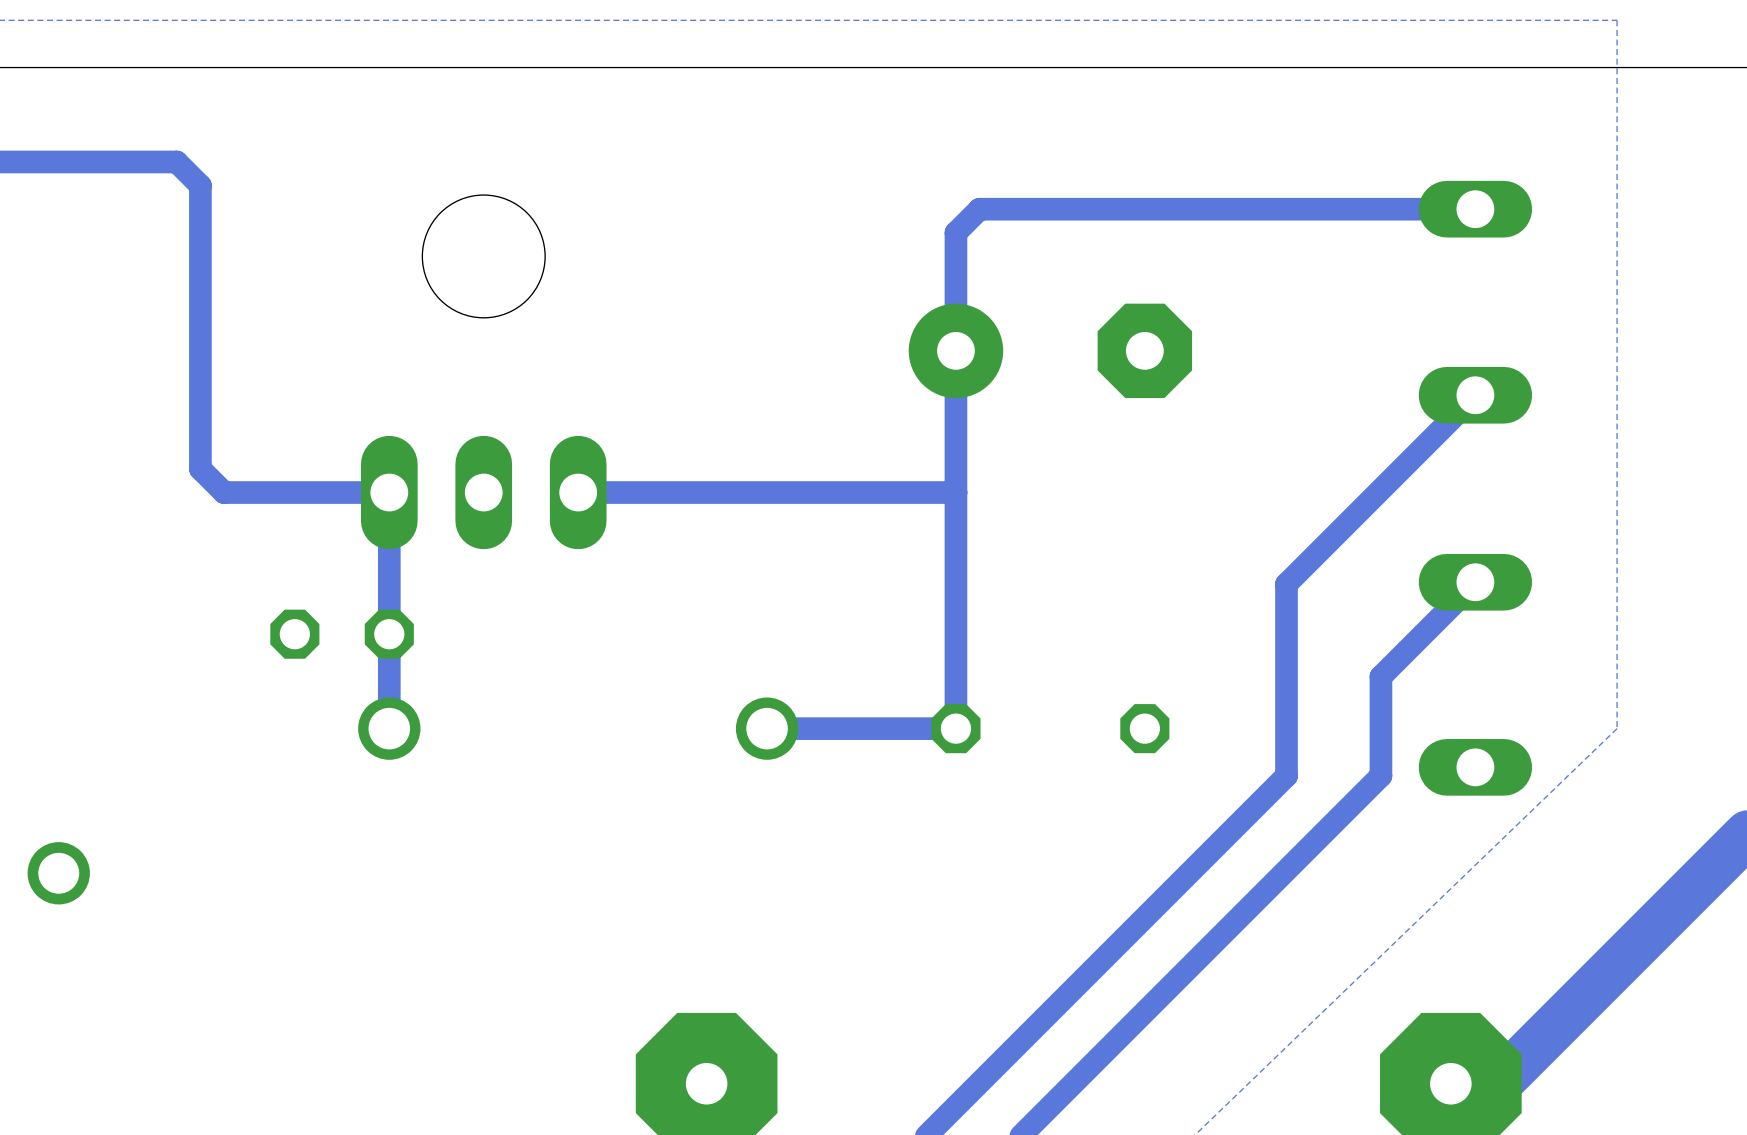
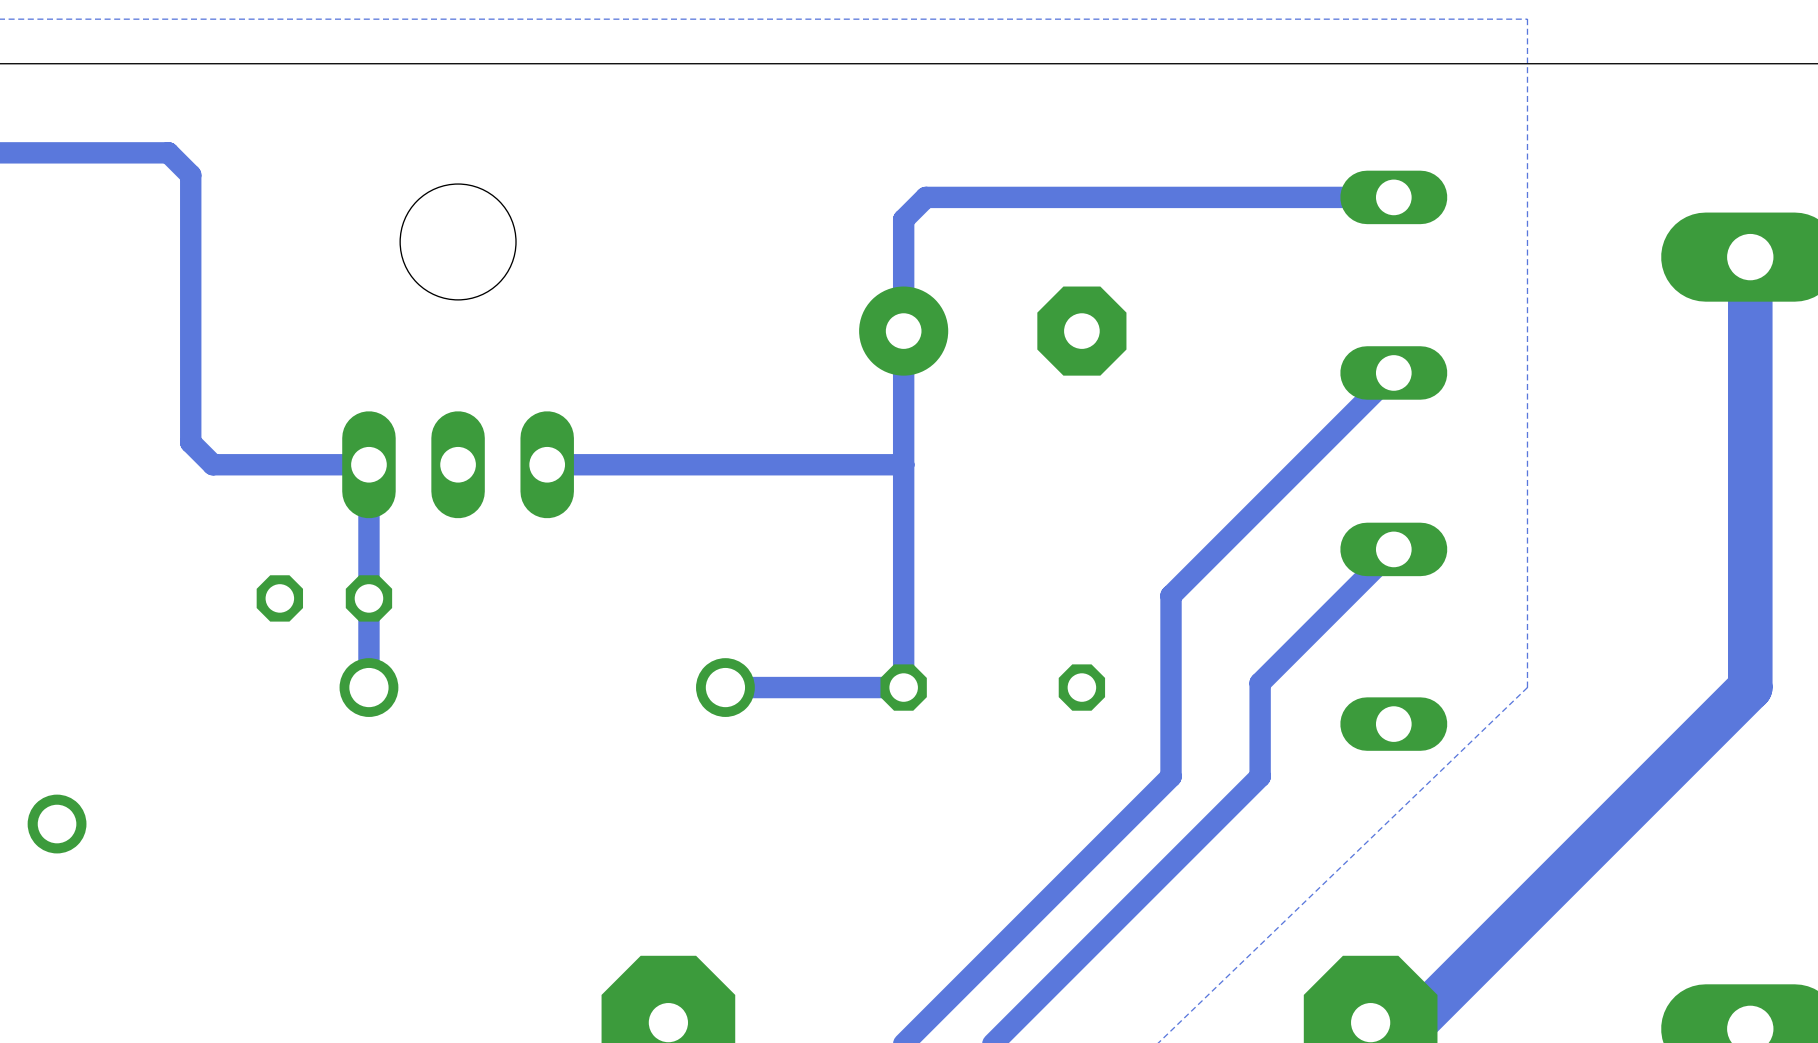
track: (1286, 584) (1286, 775) (1239, 823) -> (1215, 551) (1171, 595) (1171, 776)
track: (1380, 676) (1380, 775) (1333, 823) -> (1304, 638) (1260, 683) (1260, 776)

